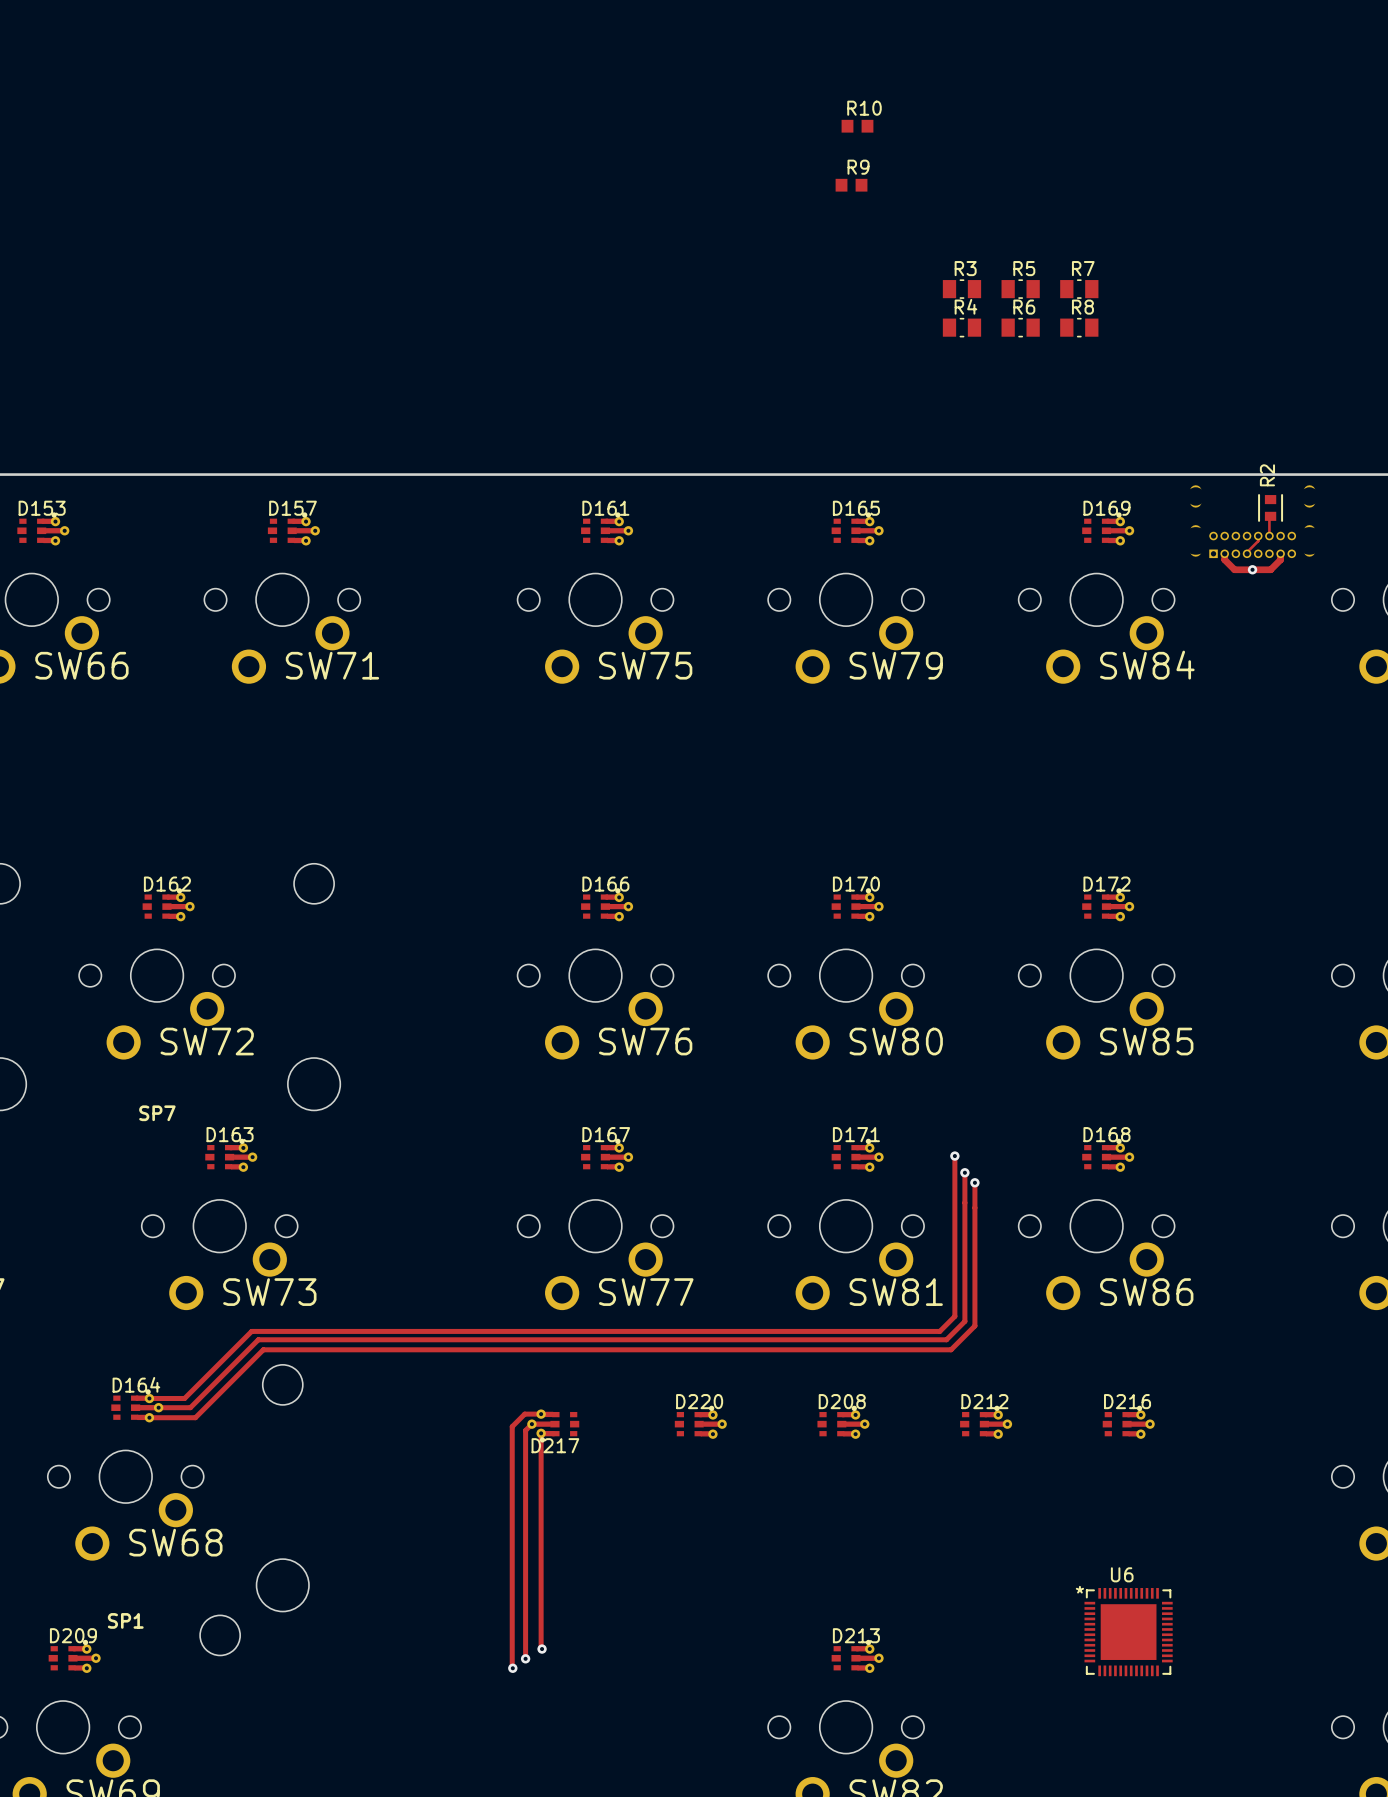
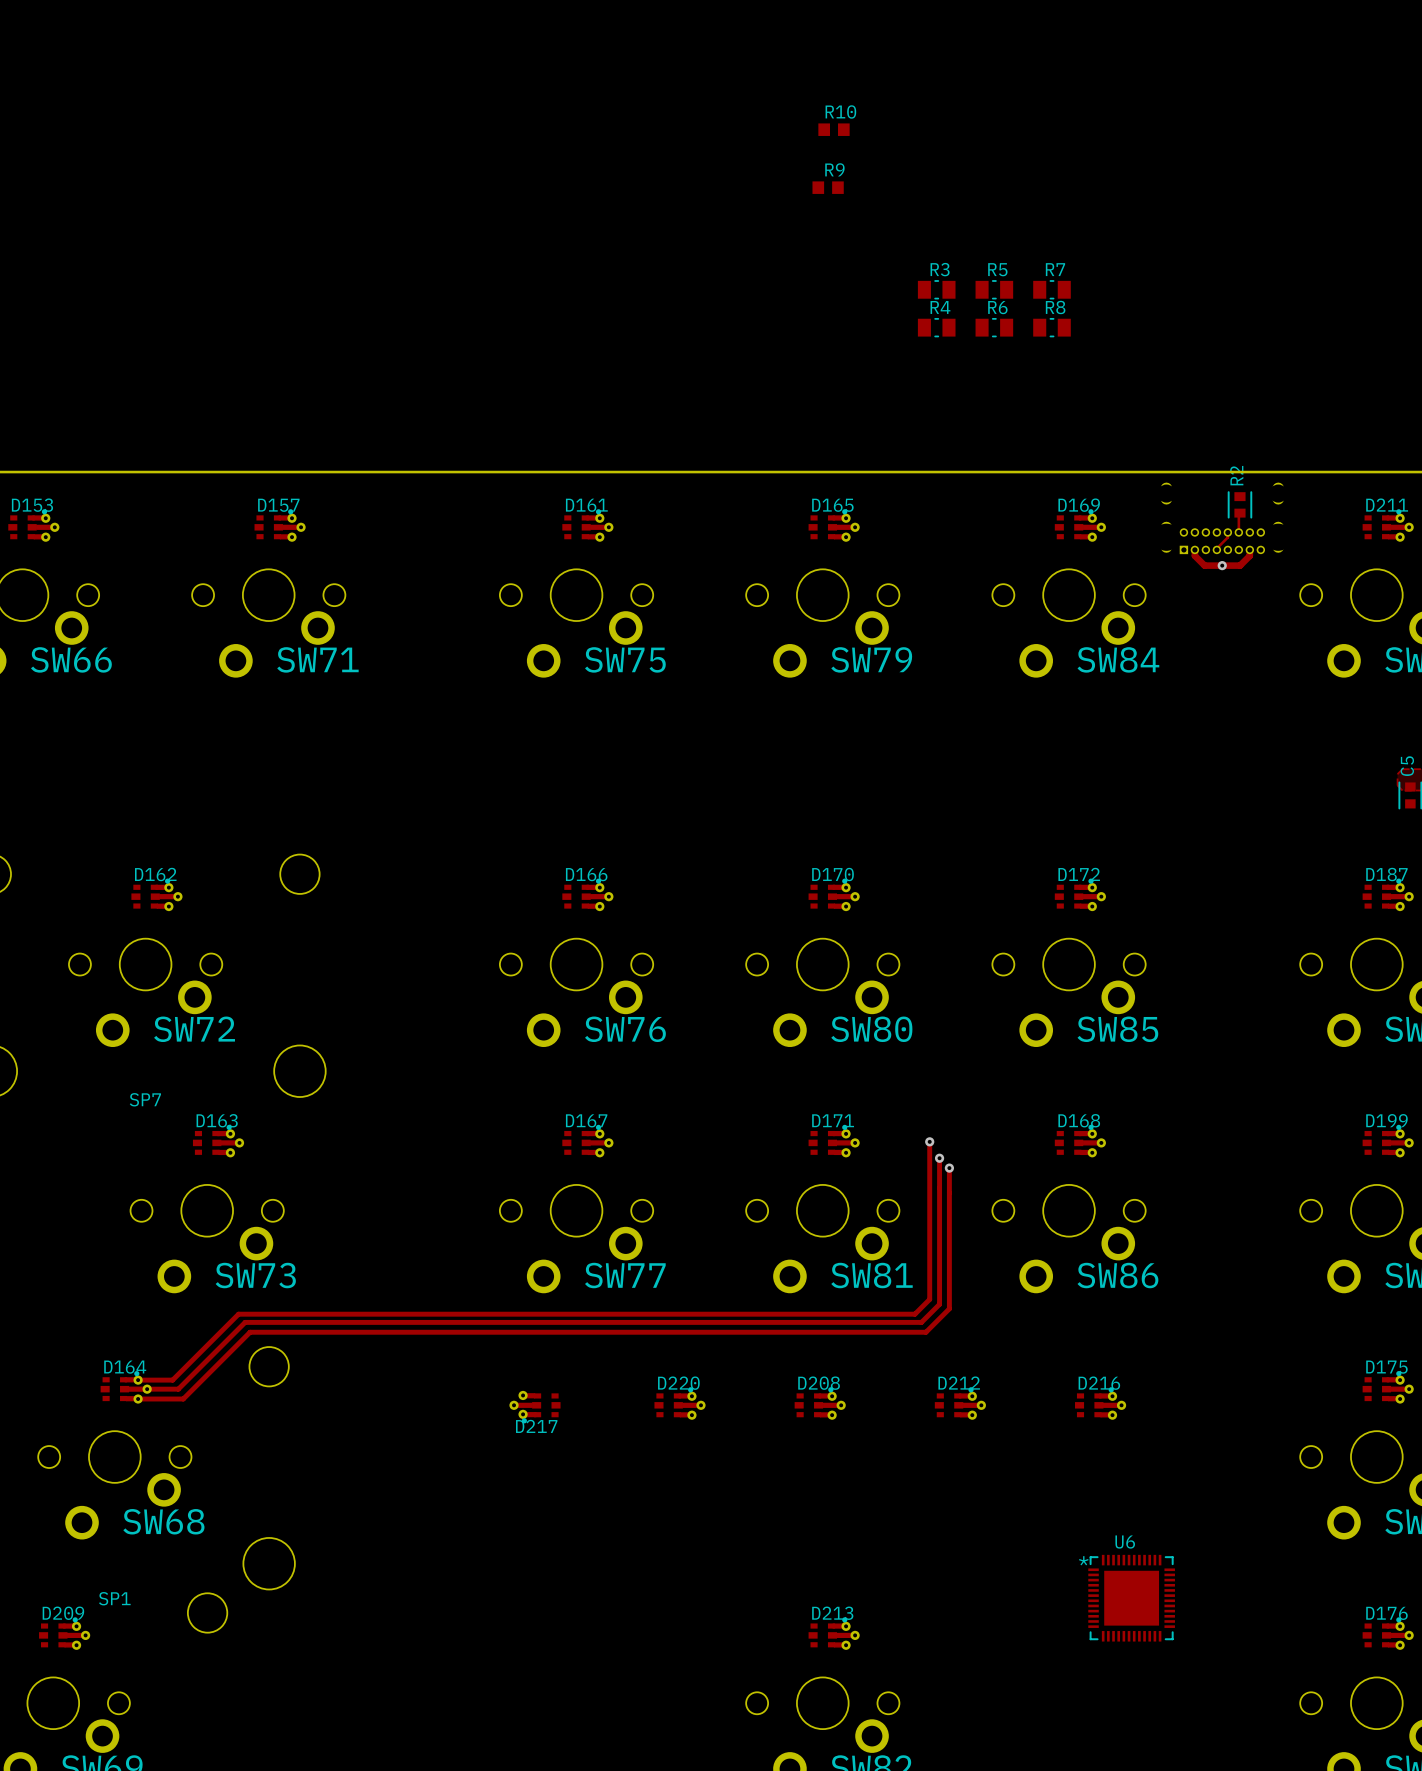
track: (541, 1414) (524, 1414) (512, 1426) (512, 1667) -> none
track: (531, 1424) (525, 1430) (525, 1658) -> none
track: (541, 1433) (541, 1647) -> none
U6 position: (1128, 1632) -> (1131, 1598)
via: (542, 1649) -> none
via: (525, 1658) -> none
via: (512, 1668) -> none

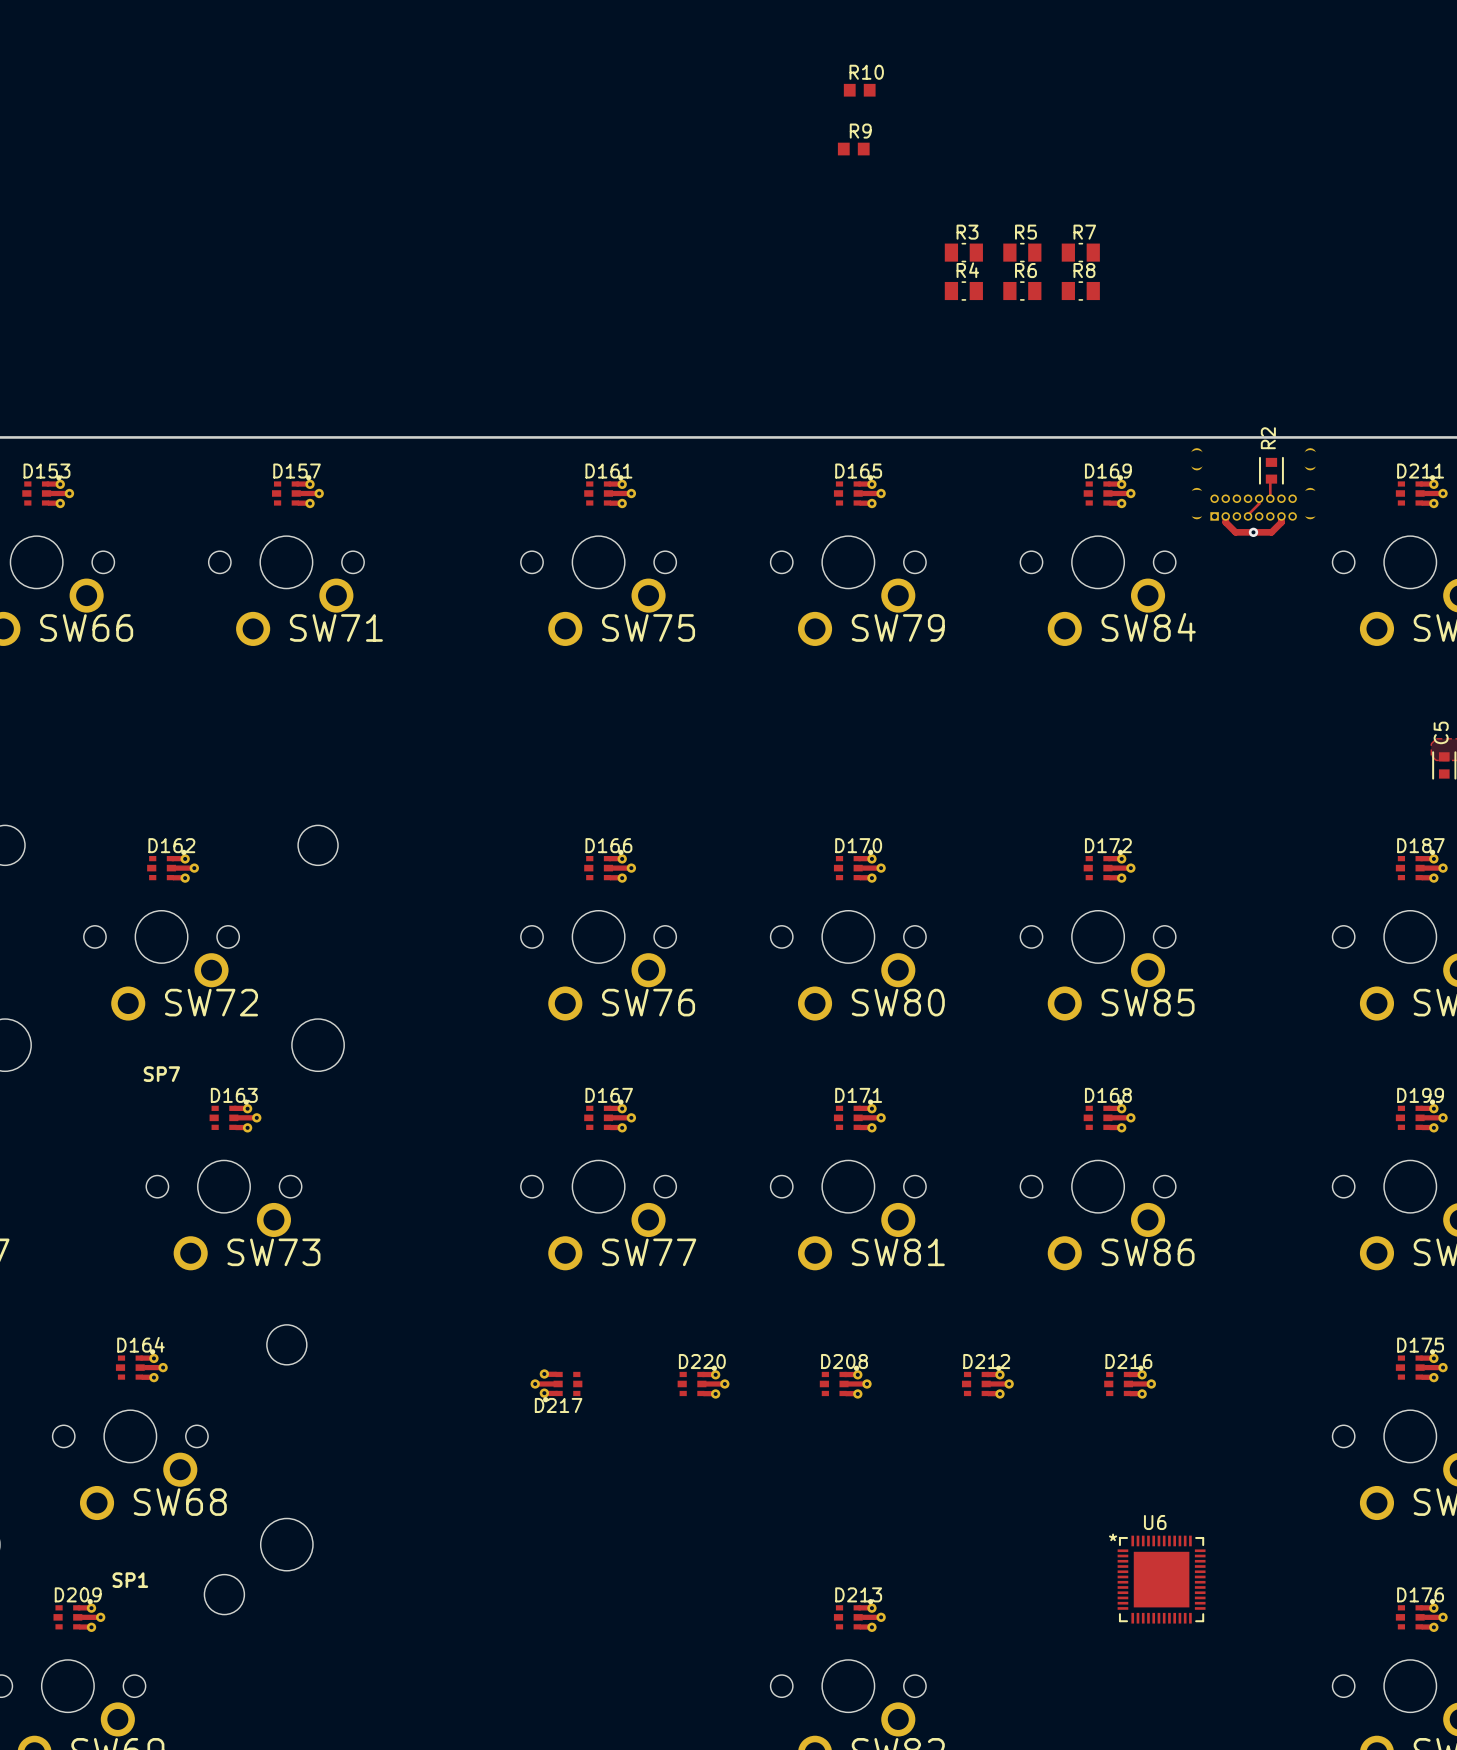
track: (929, 1141) (929, 1299) (914, 1314) (238, 1314) (172, 1380) (138, 1380) -> none
via: (929, 1141) -> none
track: (939, 1158) (939, 1304) (921, 1322) (245, 1322) (178, 1389) (147, 1389) -> none
via: (939, 1158) -> none
track: (949, 1168) (949, 1308) (925, 1332) (250, 1332) (183, 1399) (138, 1399) -> none
via: (949, 1168) -> none

